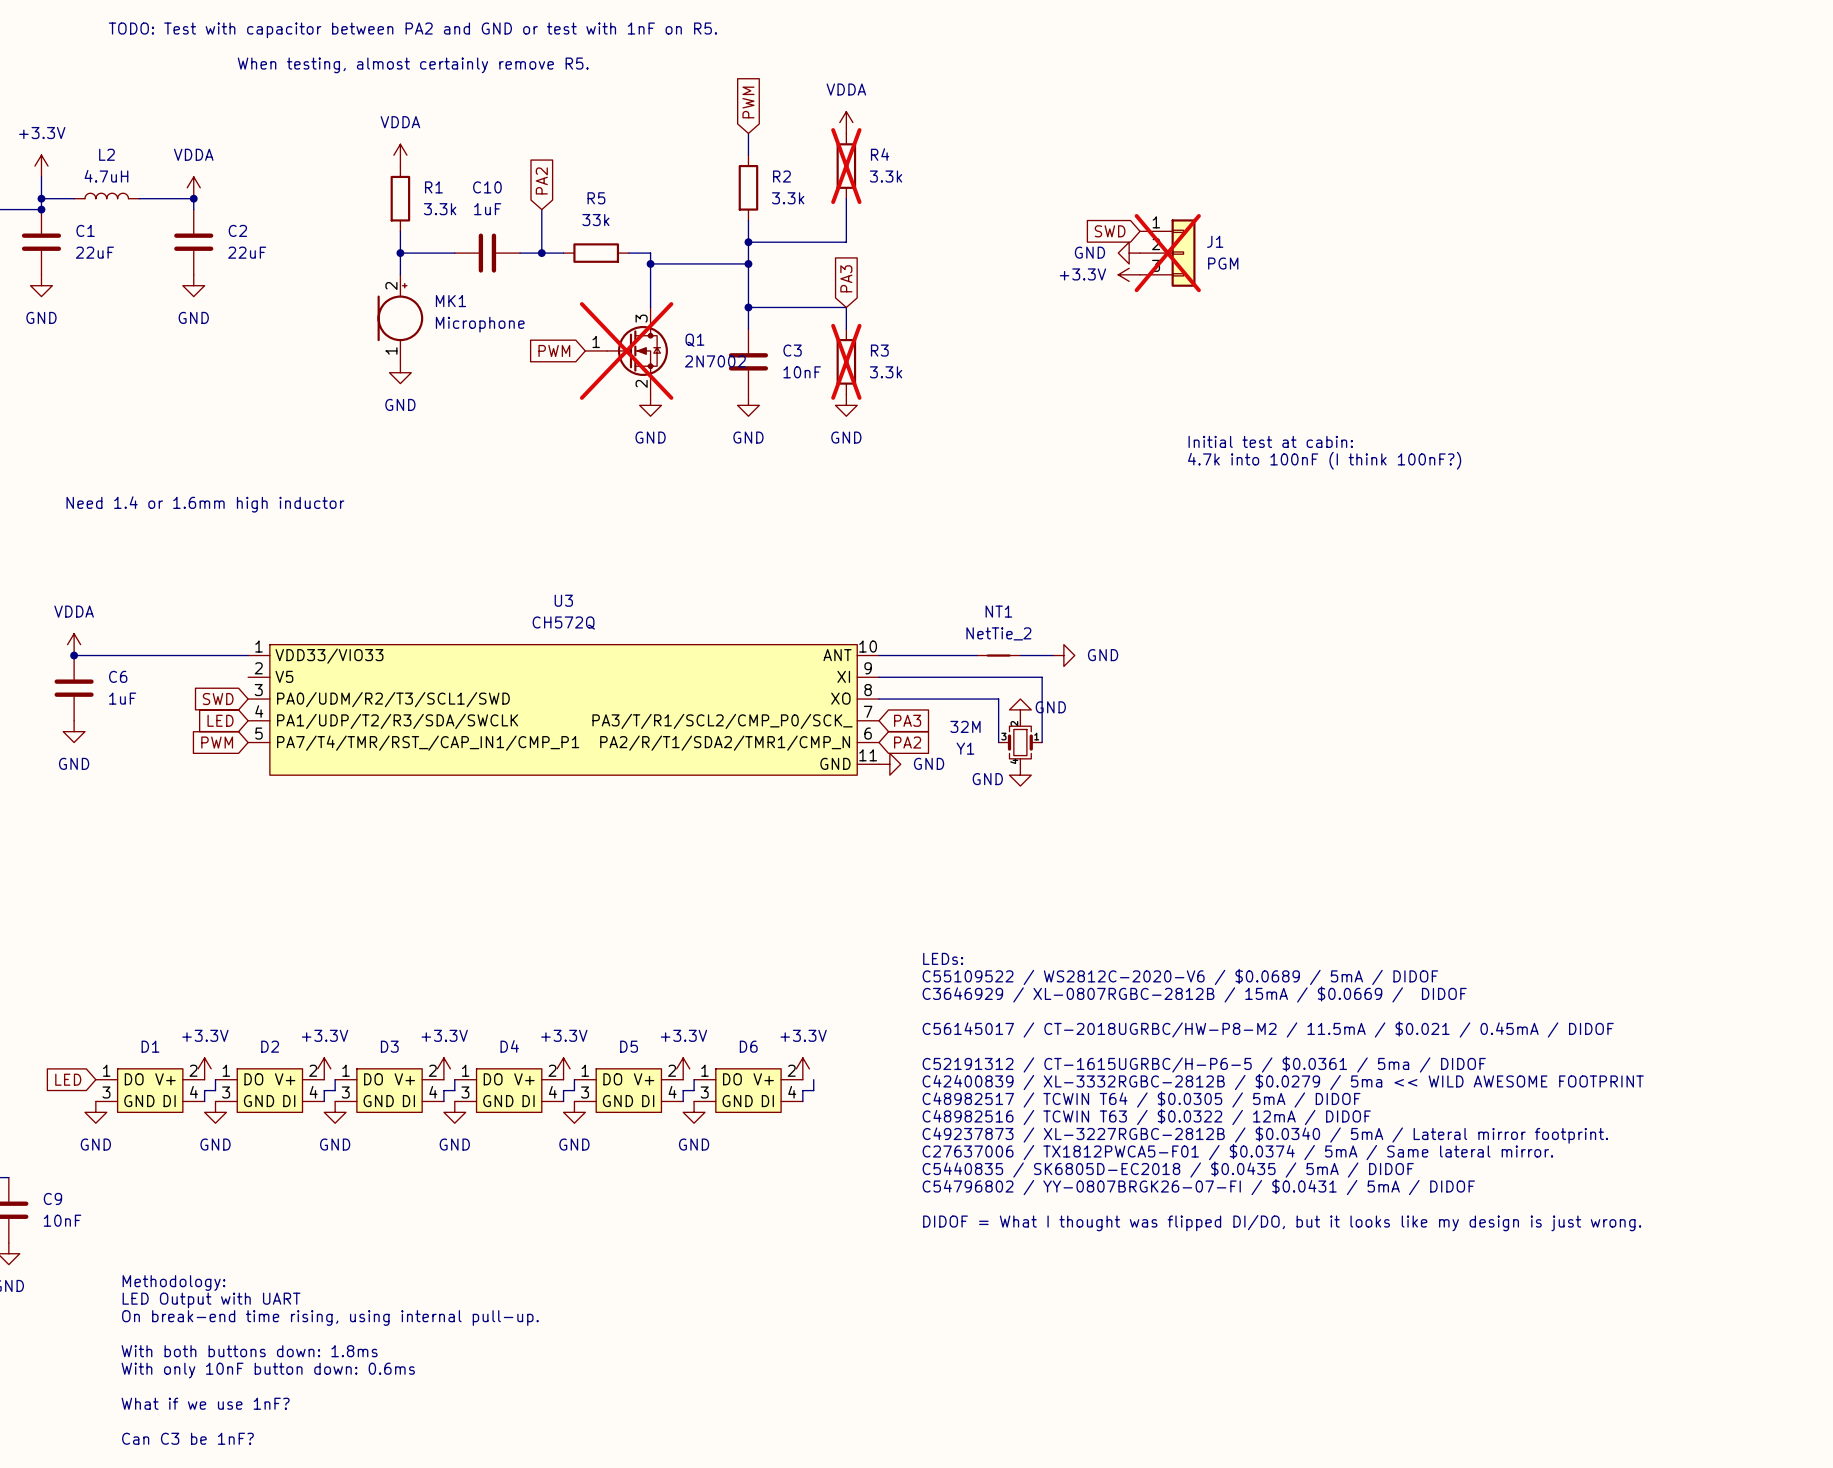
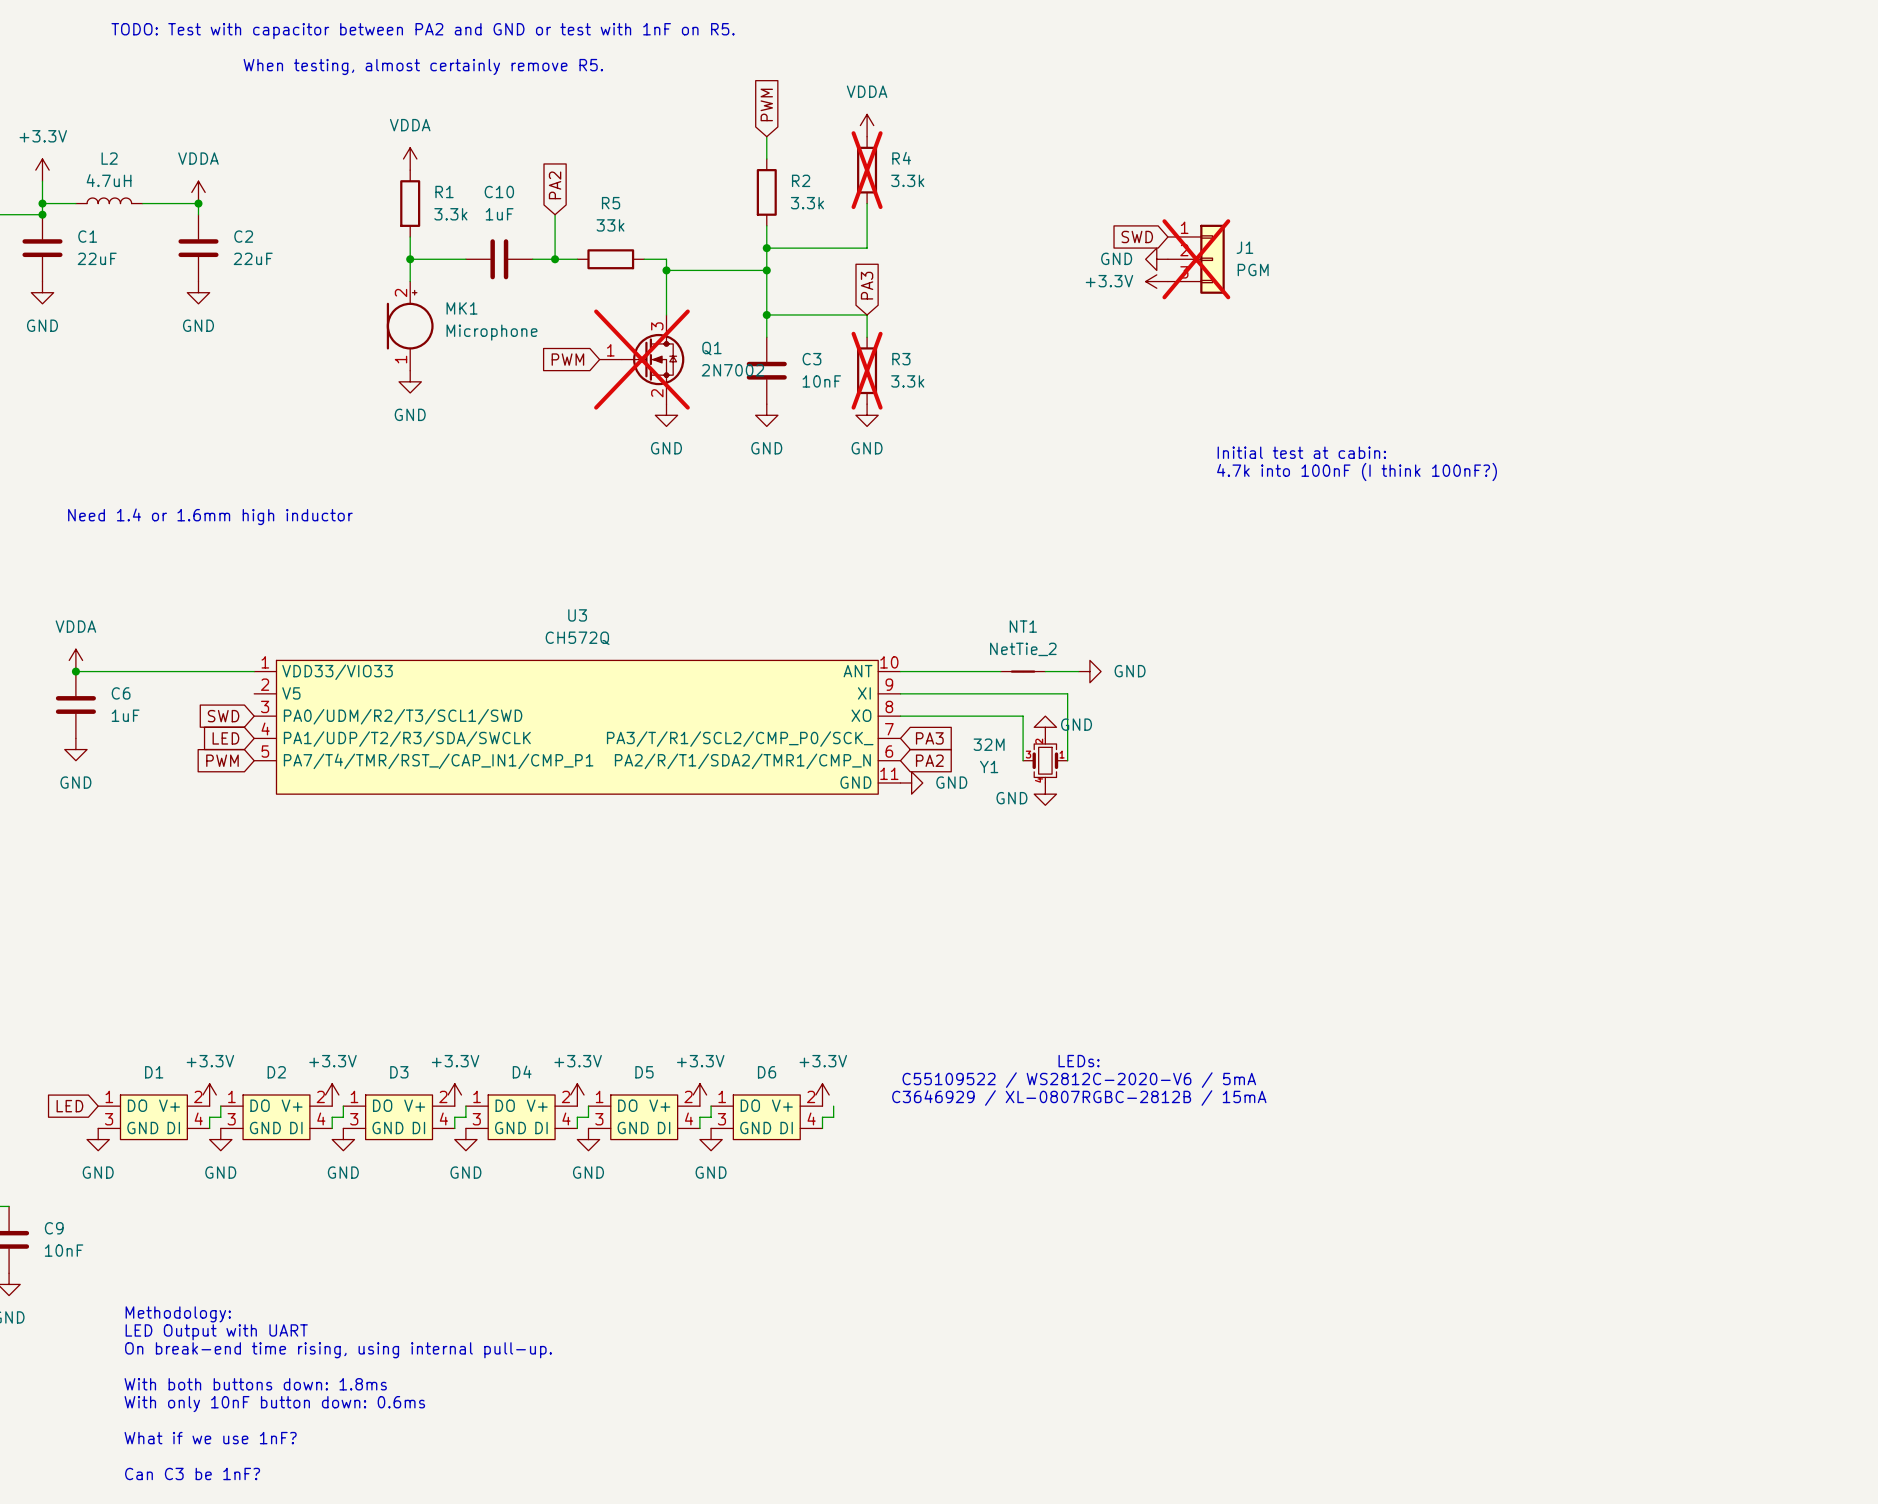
text position: LEDs: (943, 958) -> LEDs: (1079, 1061)
text: C55109522 / WS2812C-2020-V6 / $0.0689 / 5mA / DIDOF (1180, 976) -> none
text: C3646929 / XL-0807RGBC-2812B / 15mA / $0.0669 / DIDOF (1194, 994) -> none
text: C56145017 / CT-2018UGRBC/HW-P8-M2 / 11.5mA / $0.021 / 0.45mA / DIDOF (1268, 1029) -> none
text: none -> C55109522 / WS2812C-2020-V6 / 5mA (1079, 1080)
text: C52191312 / CT-1615UGRBC/H-P6-5 / $0.0361 / 5ma / DIDOF (1204, 1064) -> none
text: none -> C3646929 / XL-0807RGBC-2812B / 15mA (1079, 1098)
text: C42400839 / XL-3332RGBC-2812B / $0.0279 / 5ma << WILD AWESOME FOOTPRINT (1283, 1081) -> none
text: C48982517 / TCWIN T64 / $0.0305 / 5mA / DIDOF (1141, 1099) -> none
text: C48982516 / TCWIN T63 / $0.0322 / 12mA / DIDOF (1146, 1117) -> none
text: C49237873 / XL-3227RGBC-2812B / $0.0340 / 5mA / Lateral mirror footprint. (1265, 1135) -> none
text: C27637006 / TX1812PWCA5-F01 / $0.0374 / 5mA / Same lateral mirror. (1237, 1152) -> none
text: C5440835 / SK6805D-EC2018 / $0.0435 / 5mA / DIDOF (1168, 1169) -> none
text: C54796802 / YY-0807BRGK26-07-FI / $0.0431 / 5mA / DIDOF (1198, 1187) -> none
text: DIDOF = What I thought was flipped DI/DO, but it looks like my design is just wrong. (1282, 1223) -> none

